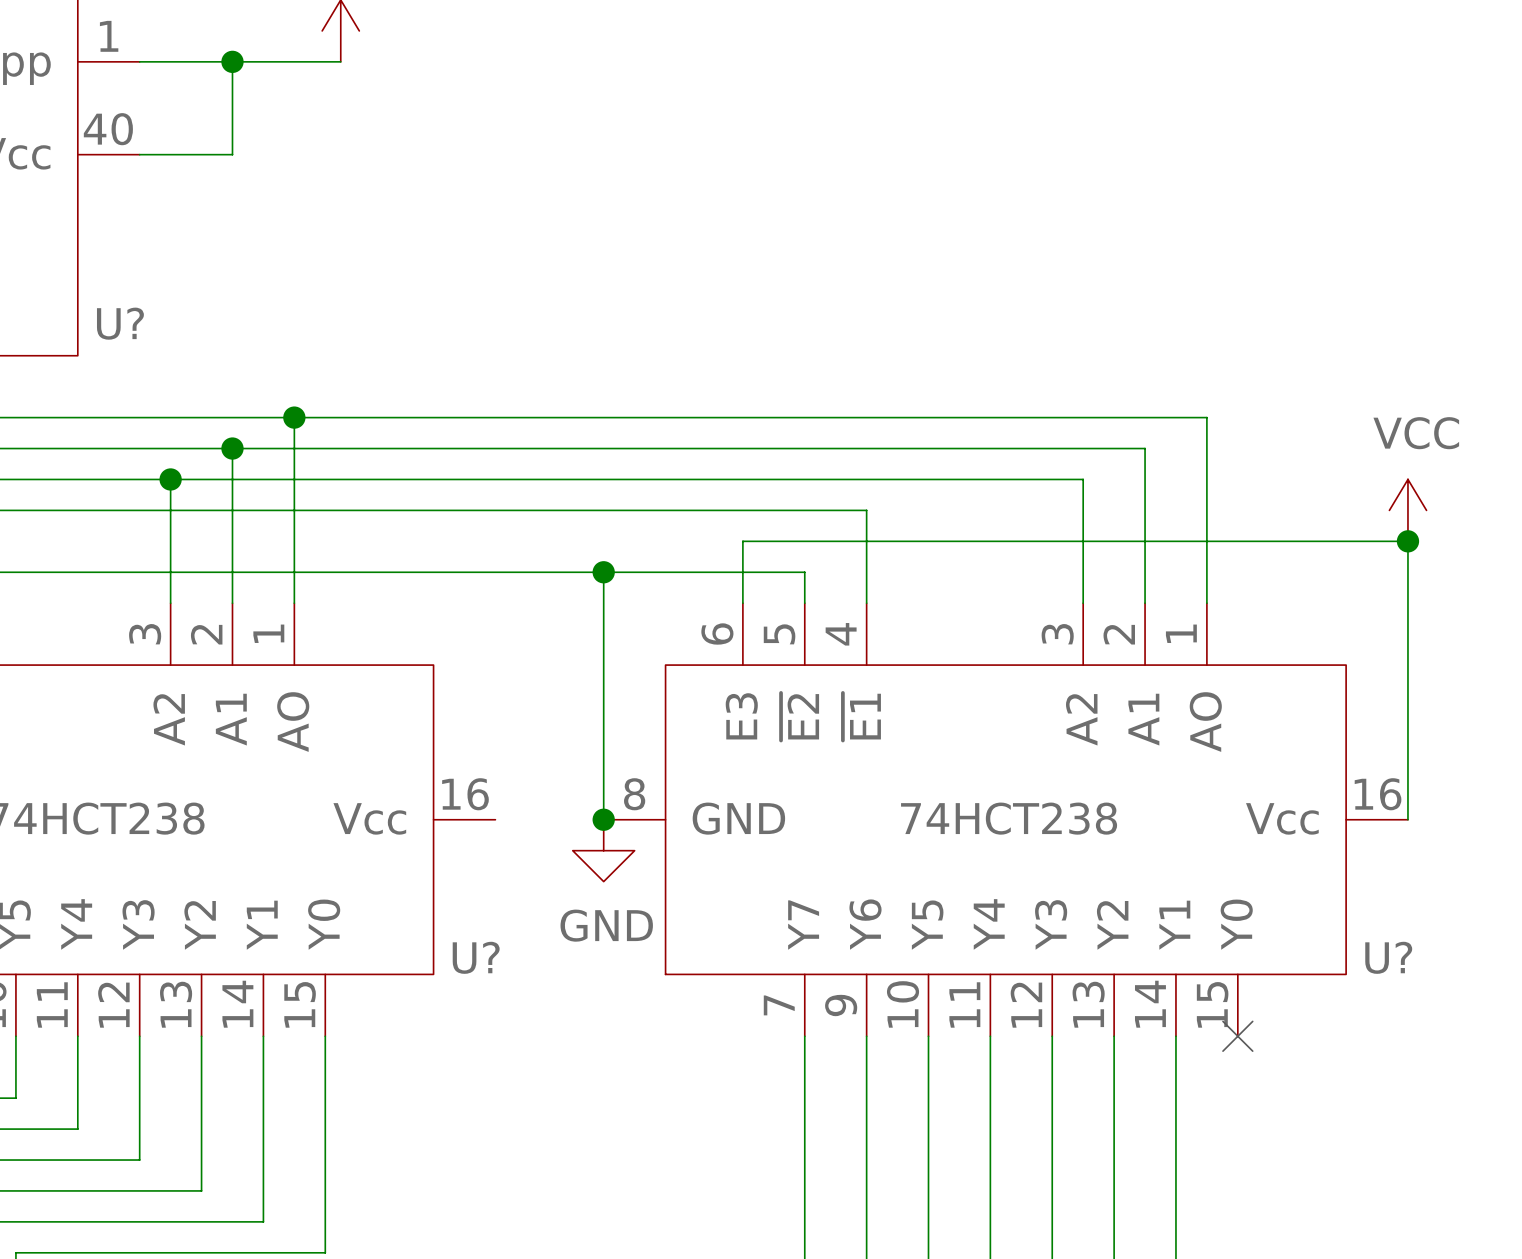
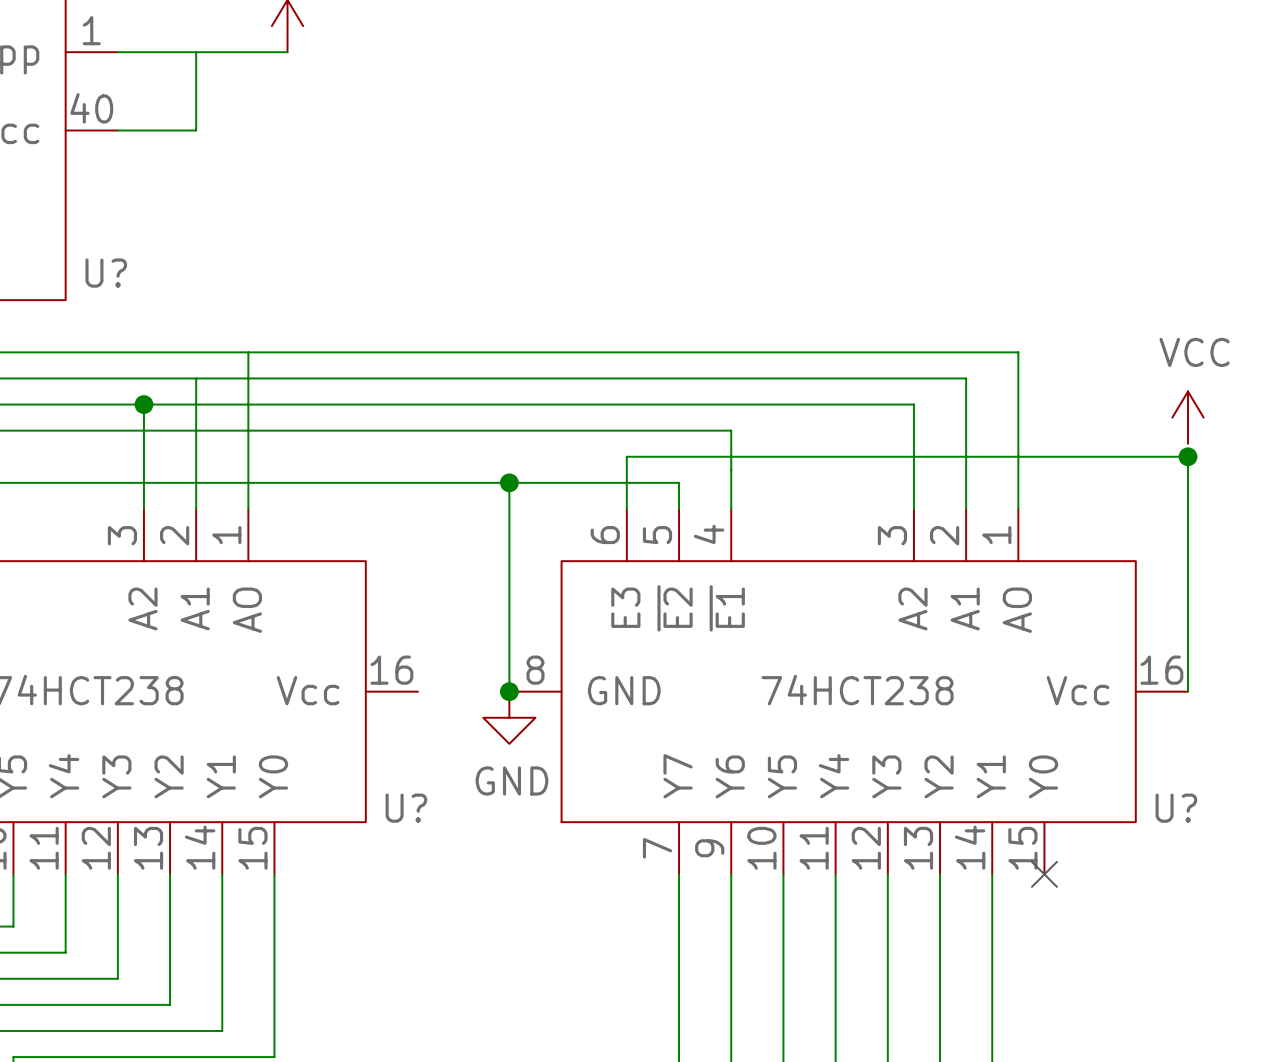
junction: (232, 61) -> none
junction: (294, 417) -> none
junction: (232, 448) -> none
power symbol position: VCC (1407, 510) -> VCC (1188, 417)

